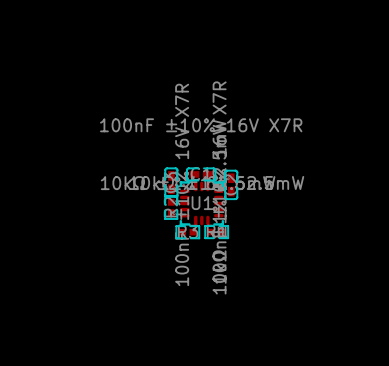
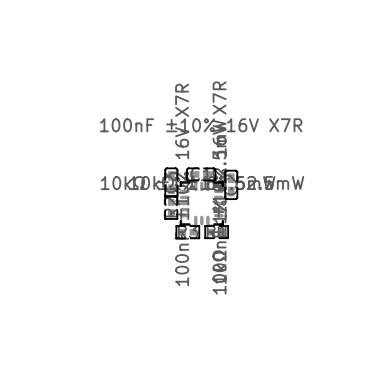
U1 name: U1 (202, 203) -> none

